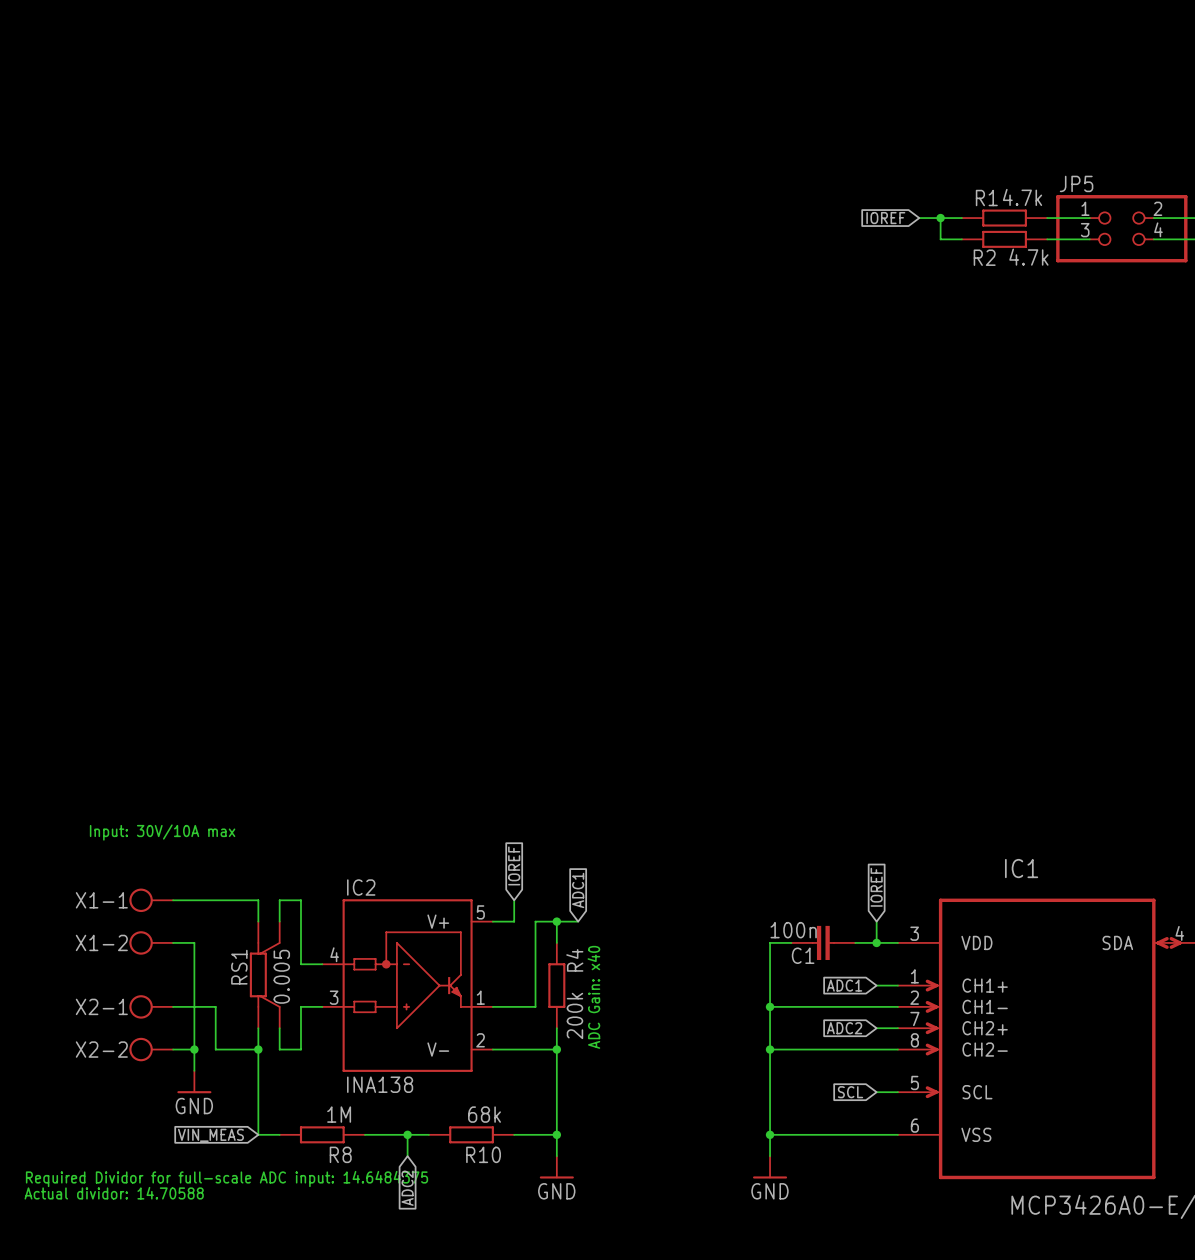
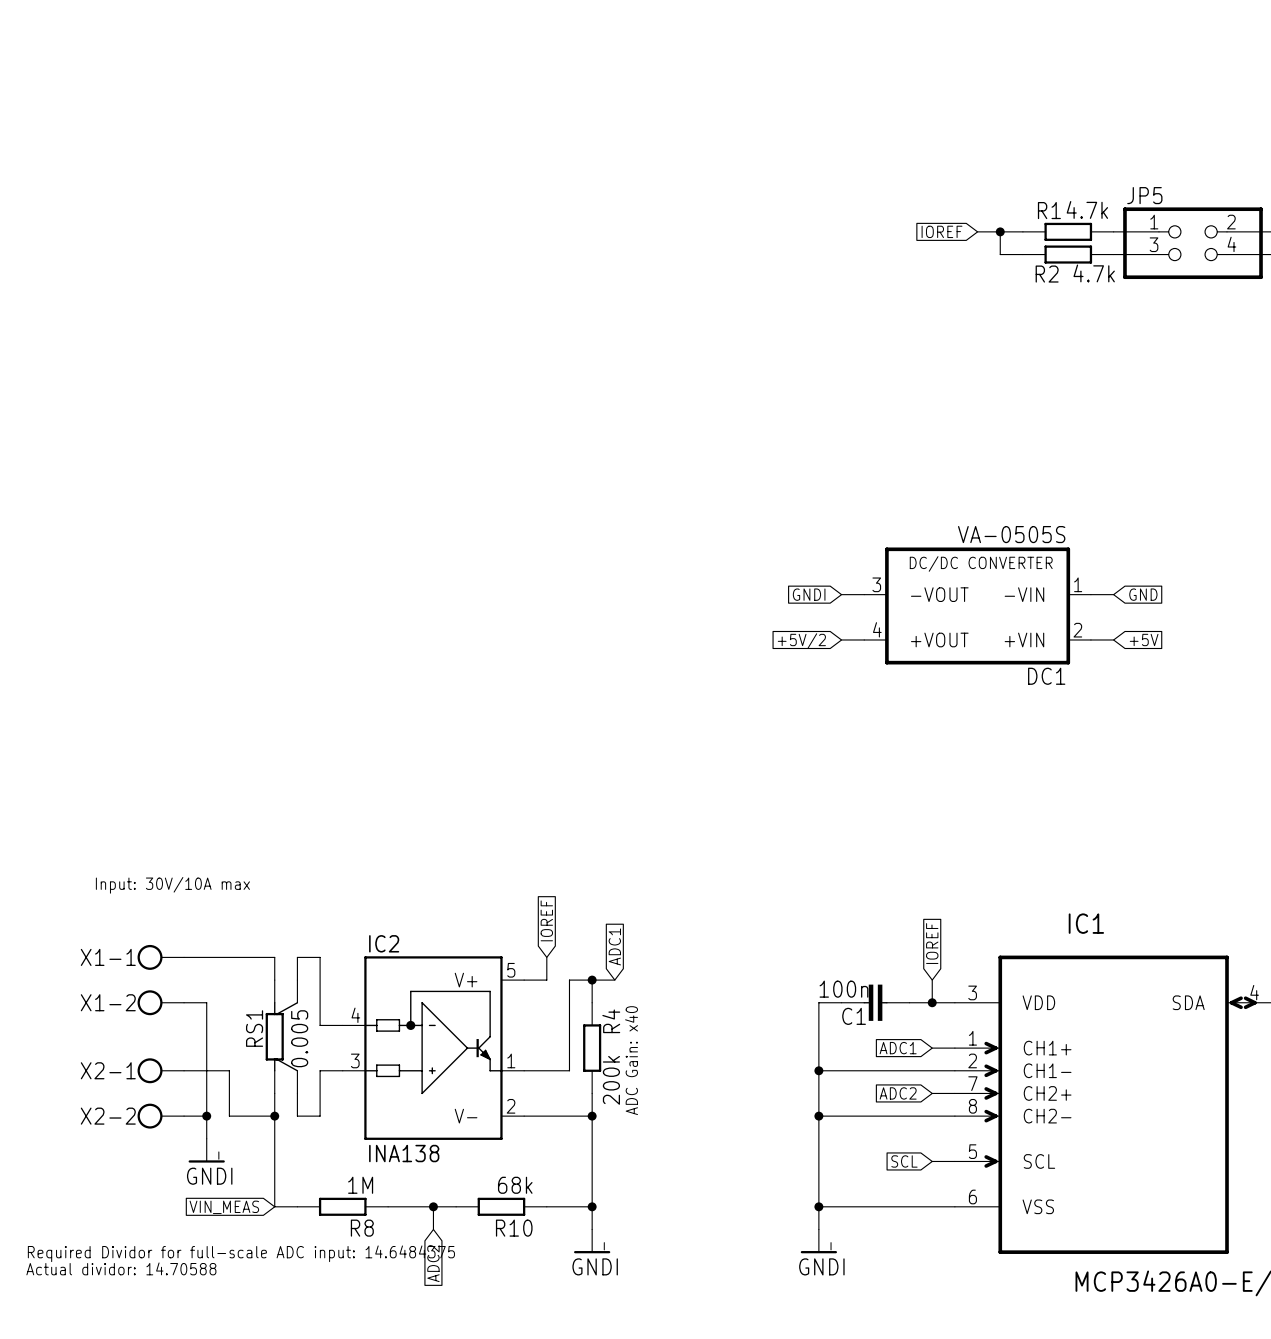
global label: none -> GNDI (809, 594)
wire: none -> (841, 594) (864, 594)
wire: none -> (1090, 594) (1113, 594)
global label: none -> GND (1143, 594)
DC1: none -> VA-0505S (977, 605)
wire: none -> (841, 639) (864, 639)
wire: none -> (1090, 639) (1113, 639)
global label: none -> +5V (1144, 639)
global label: none -> +5V/2 (801, 641)
power symbol: GND (194, 1082) -> GNDI (206, 1150)
power symbol: GND (556, 1167) -> GNDI (592, 1241)
power symbol: GND (770, 1167) -> GNDI (818, 1241)

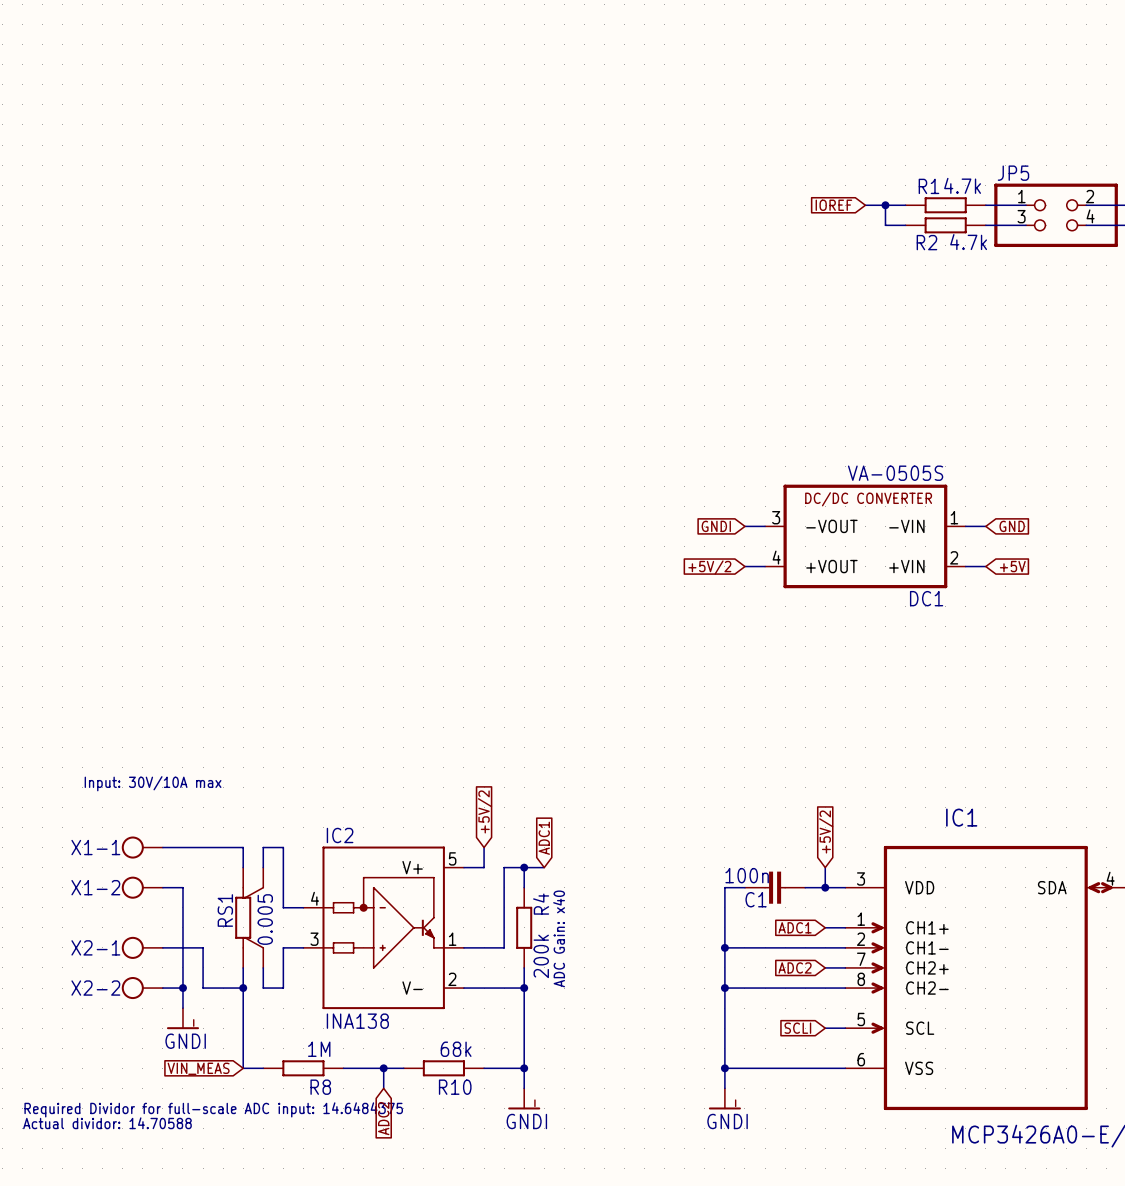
global label: IOREF (546, 920) -> +5V/2 (485, 811)
global label: IOREF (932, 943) -> +5V/2 (826, 832)
global label: SCL (904, 1161) -> SCLI (797, 1028)

